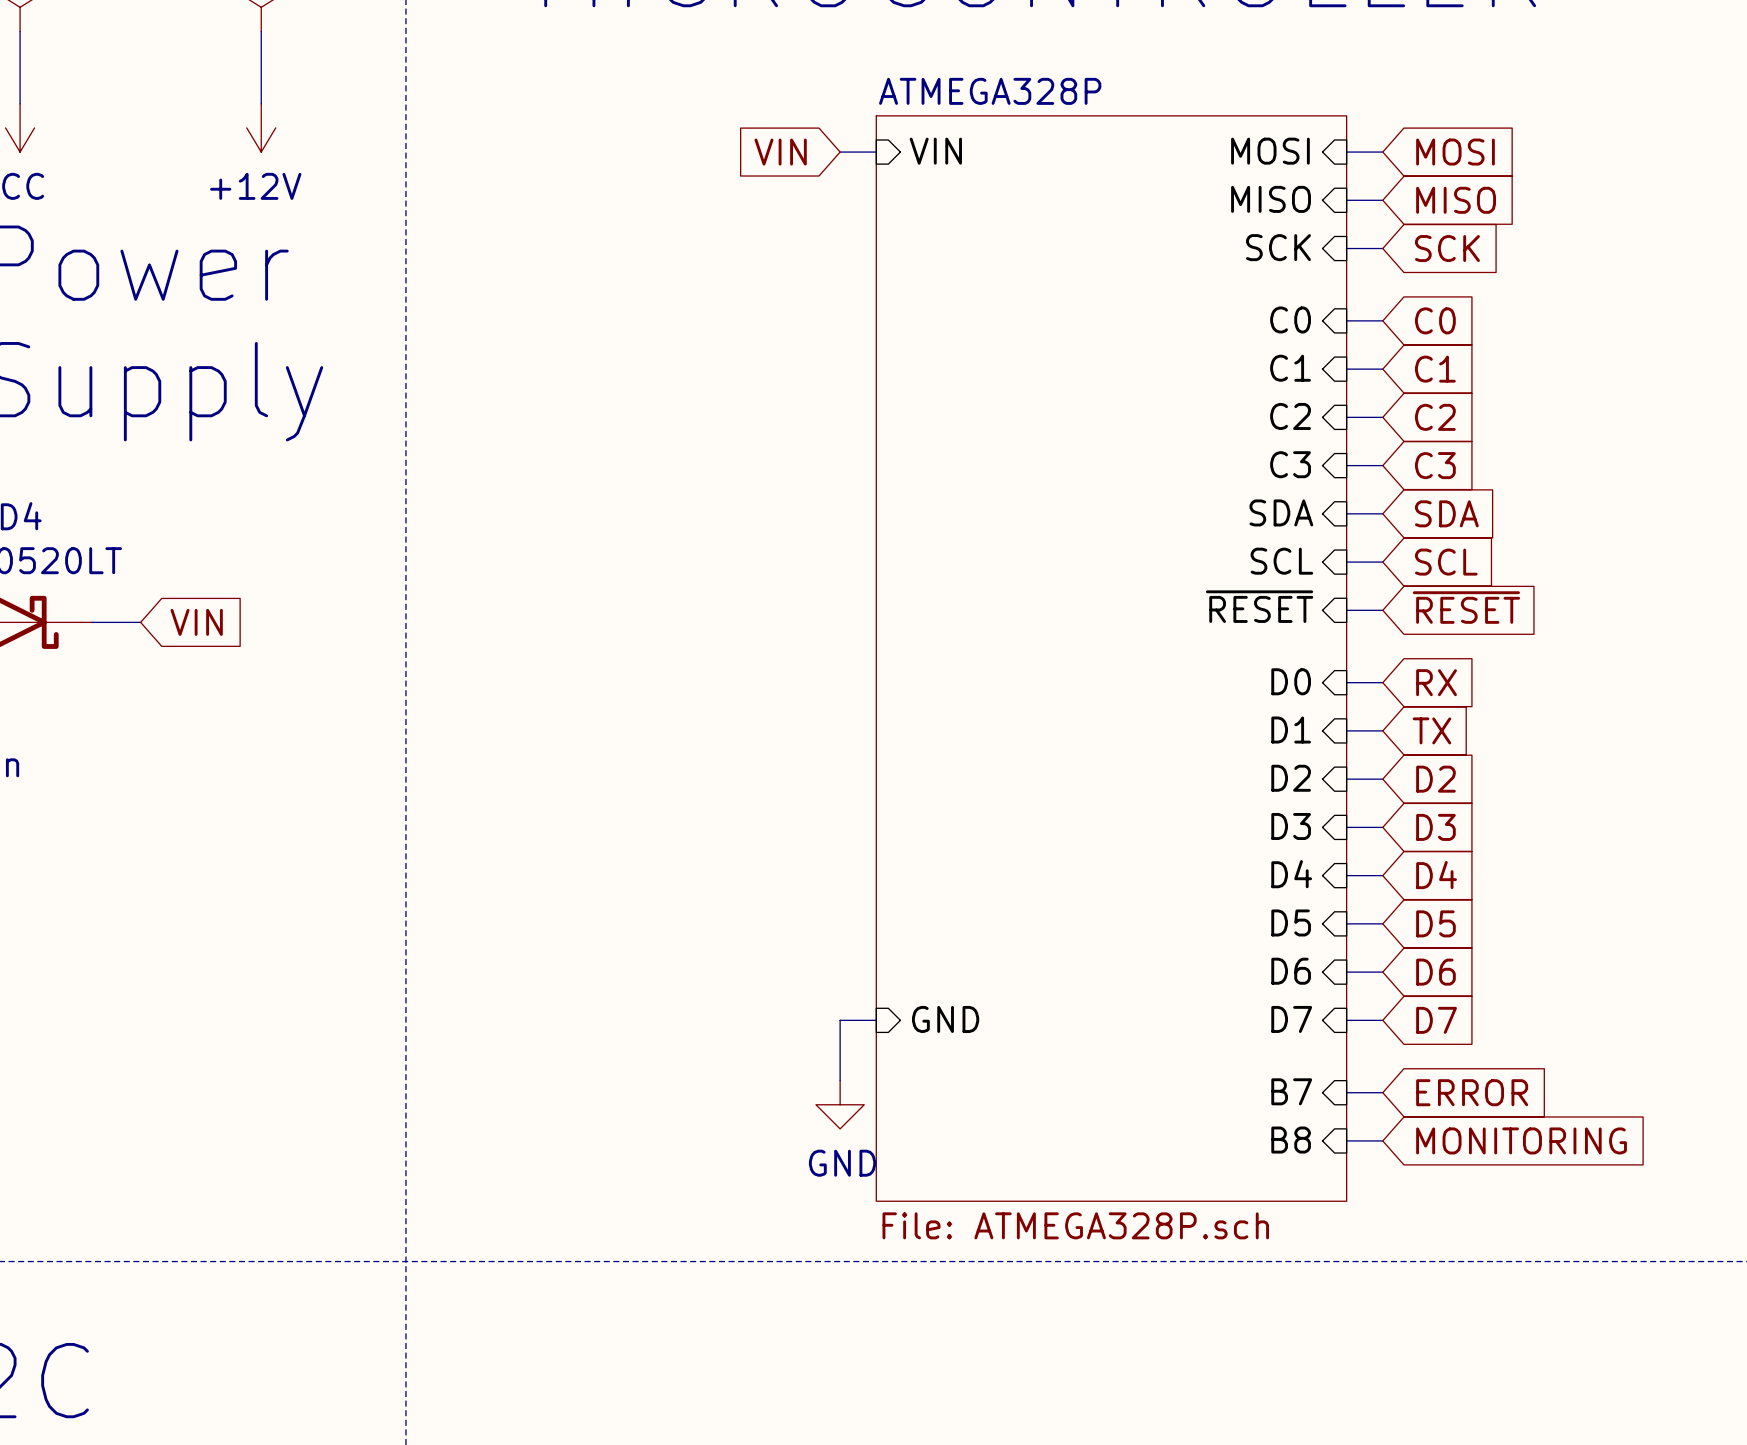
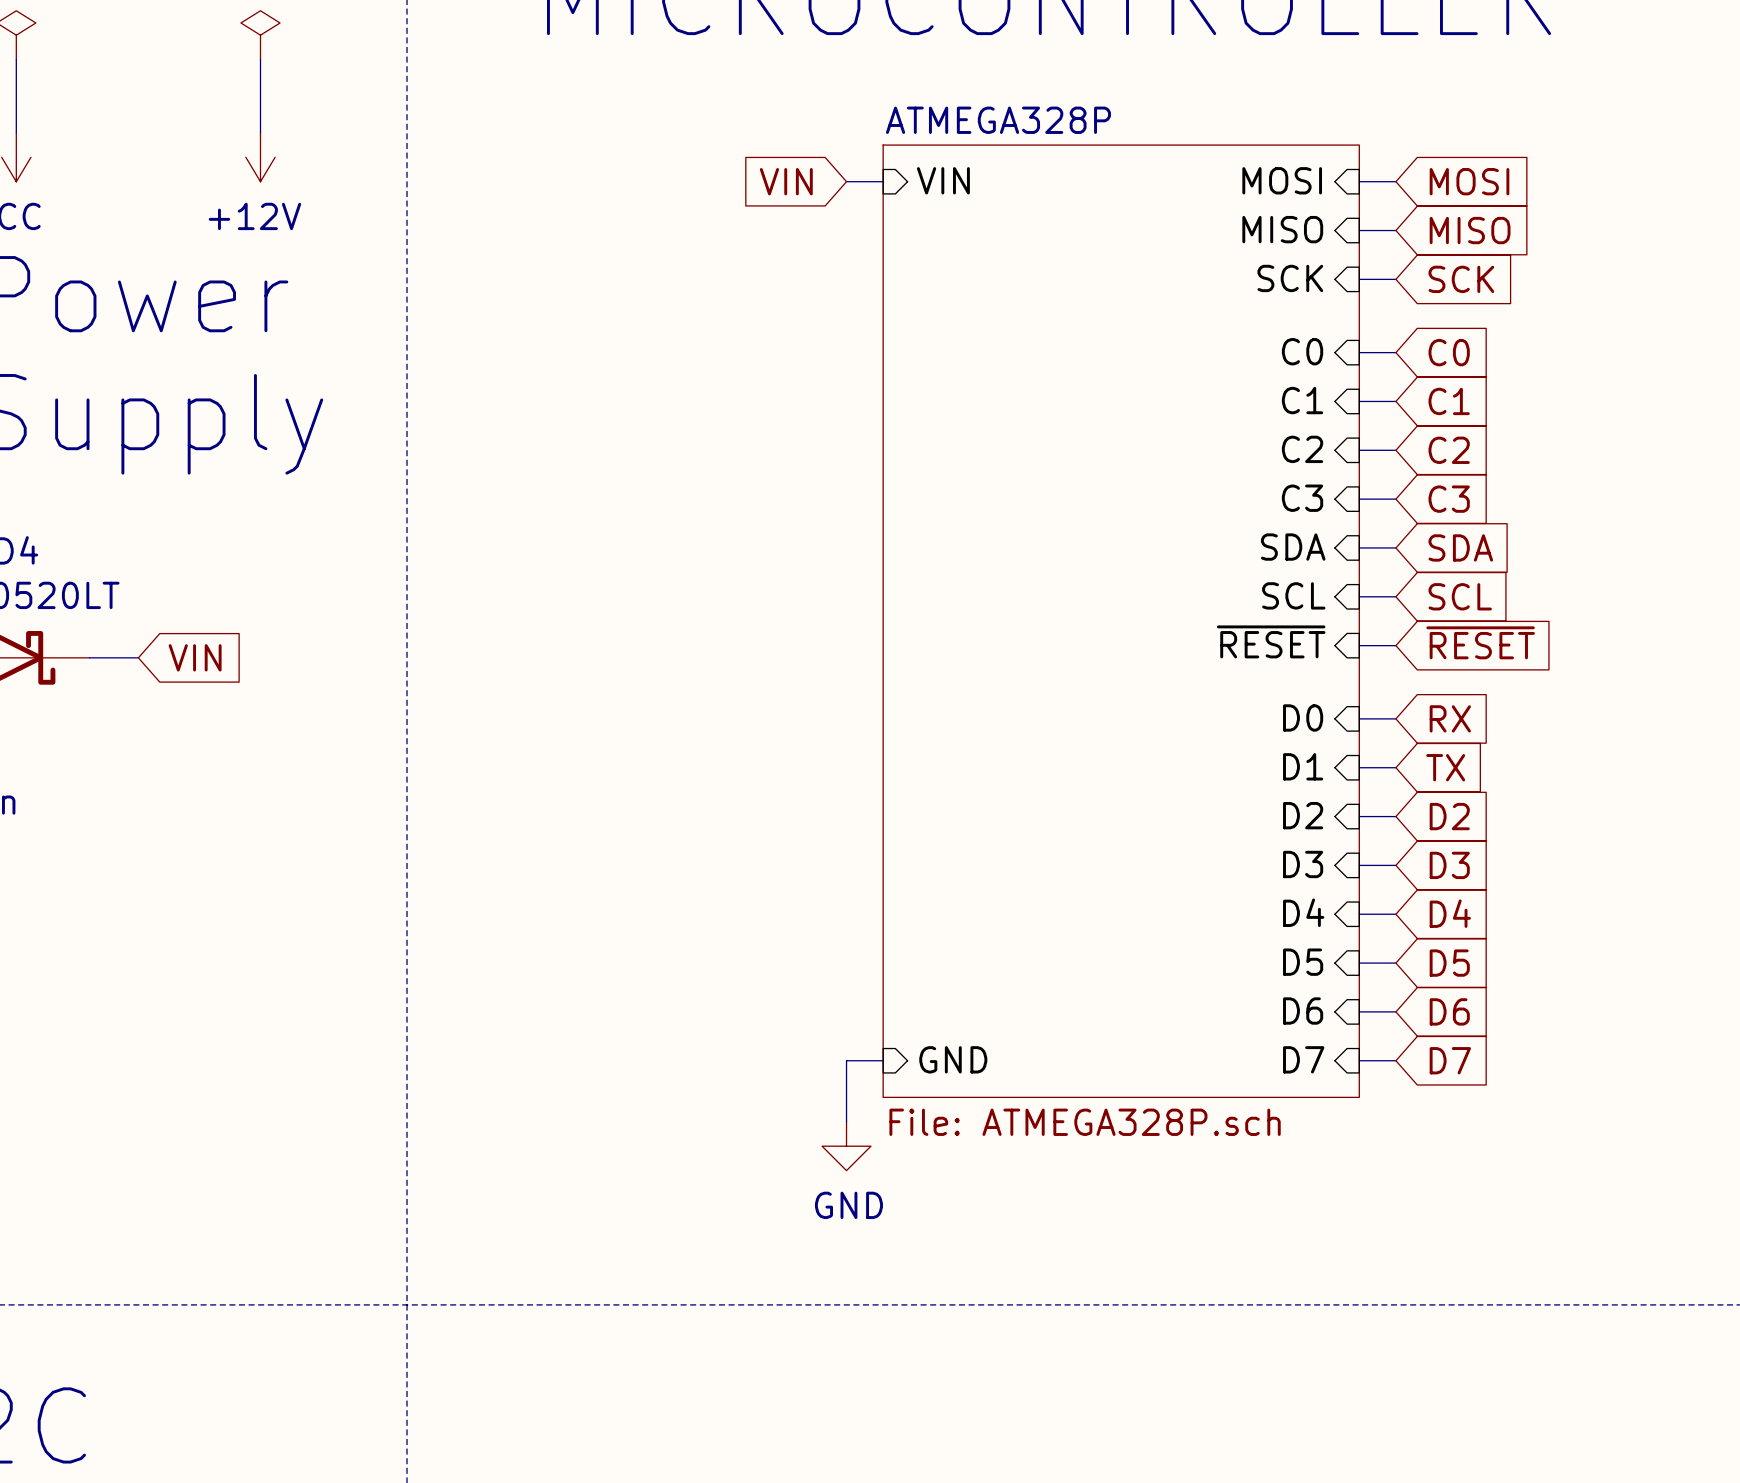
sheet ATMEGA328P shape: [876, 115, 1347, 1202] -> [883, 145, 1360, 1098]
sheet pin: B7 (1291, 1091) -> none
wire: (1346, 1092) (1382, 1092) -> none
global label: ERROR (1472, 1092) -> none
sheet pin: B8 (1291, 1140) -> none
wire: (1346, 1140) (1382, 1140) -> none
global label: MONITORING (1521, 1140) -> none
sheet ATMEGA328P value position: File: ATMEGA328P.sch (1075, 1225) -> File: ATMEGA328P.sch (1085, 1122)

